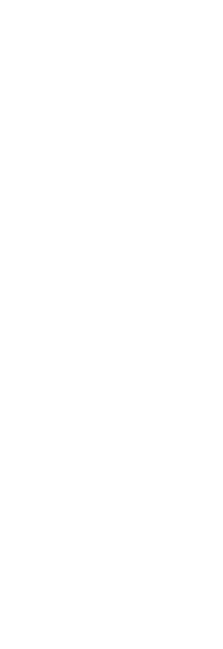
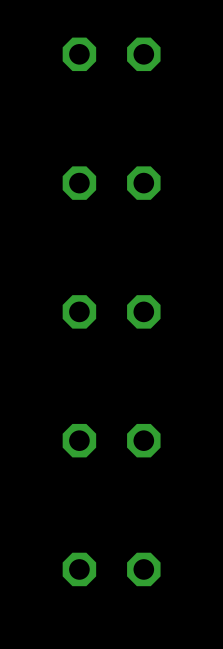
part: none -> (111, 54)
part: none -> (111, 183)
part: none -> (111, 311)
part: none -> (111, 440)
part: none -> (111, 569)

